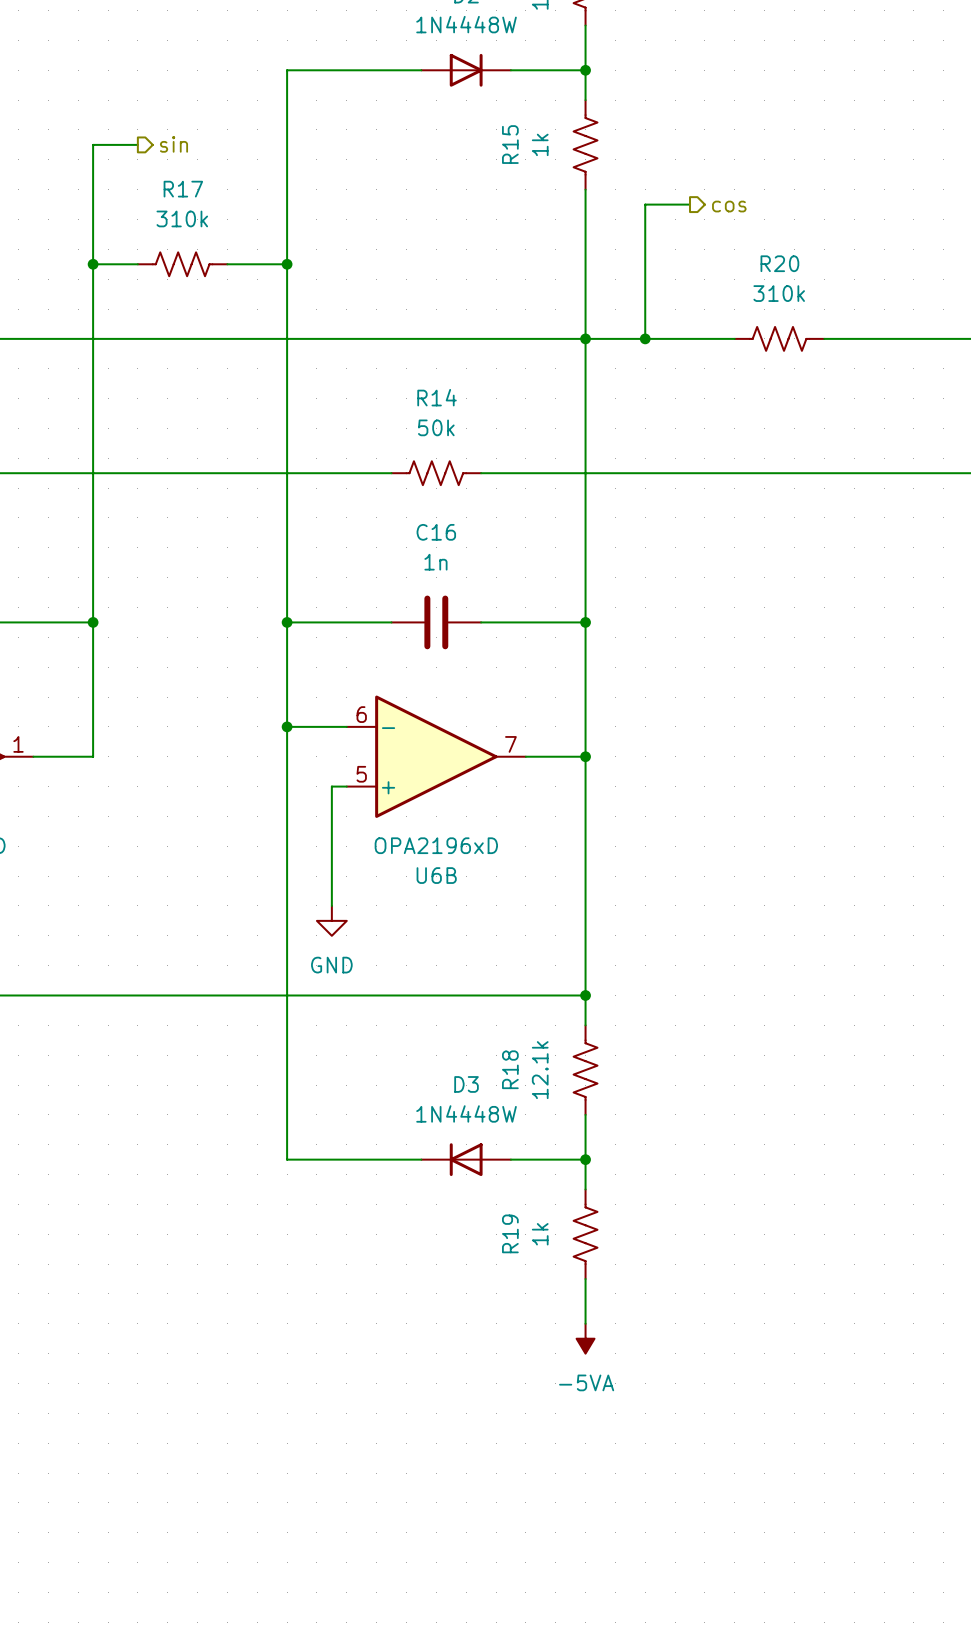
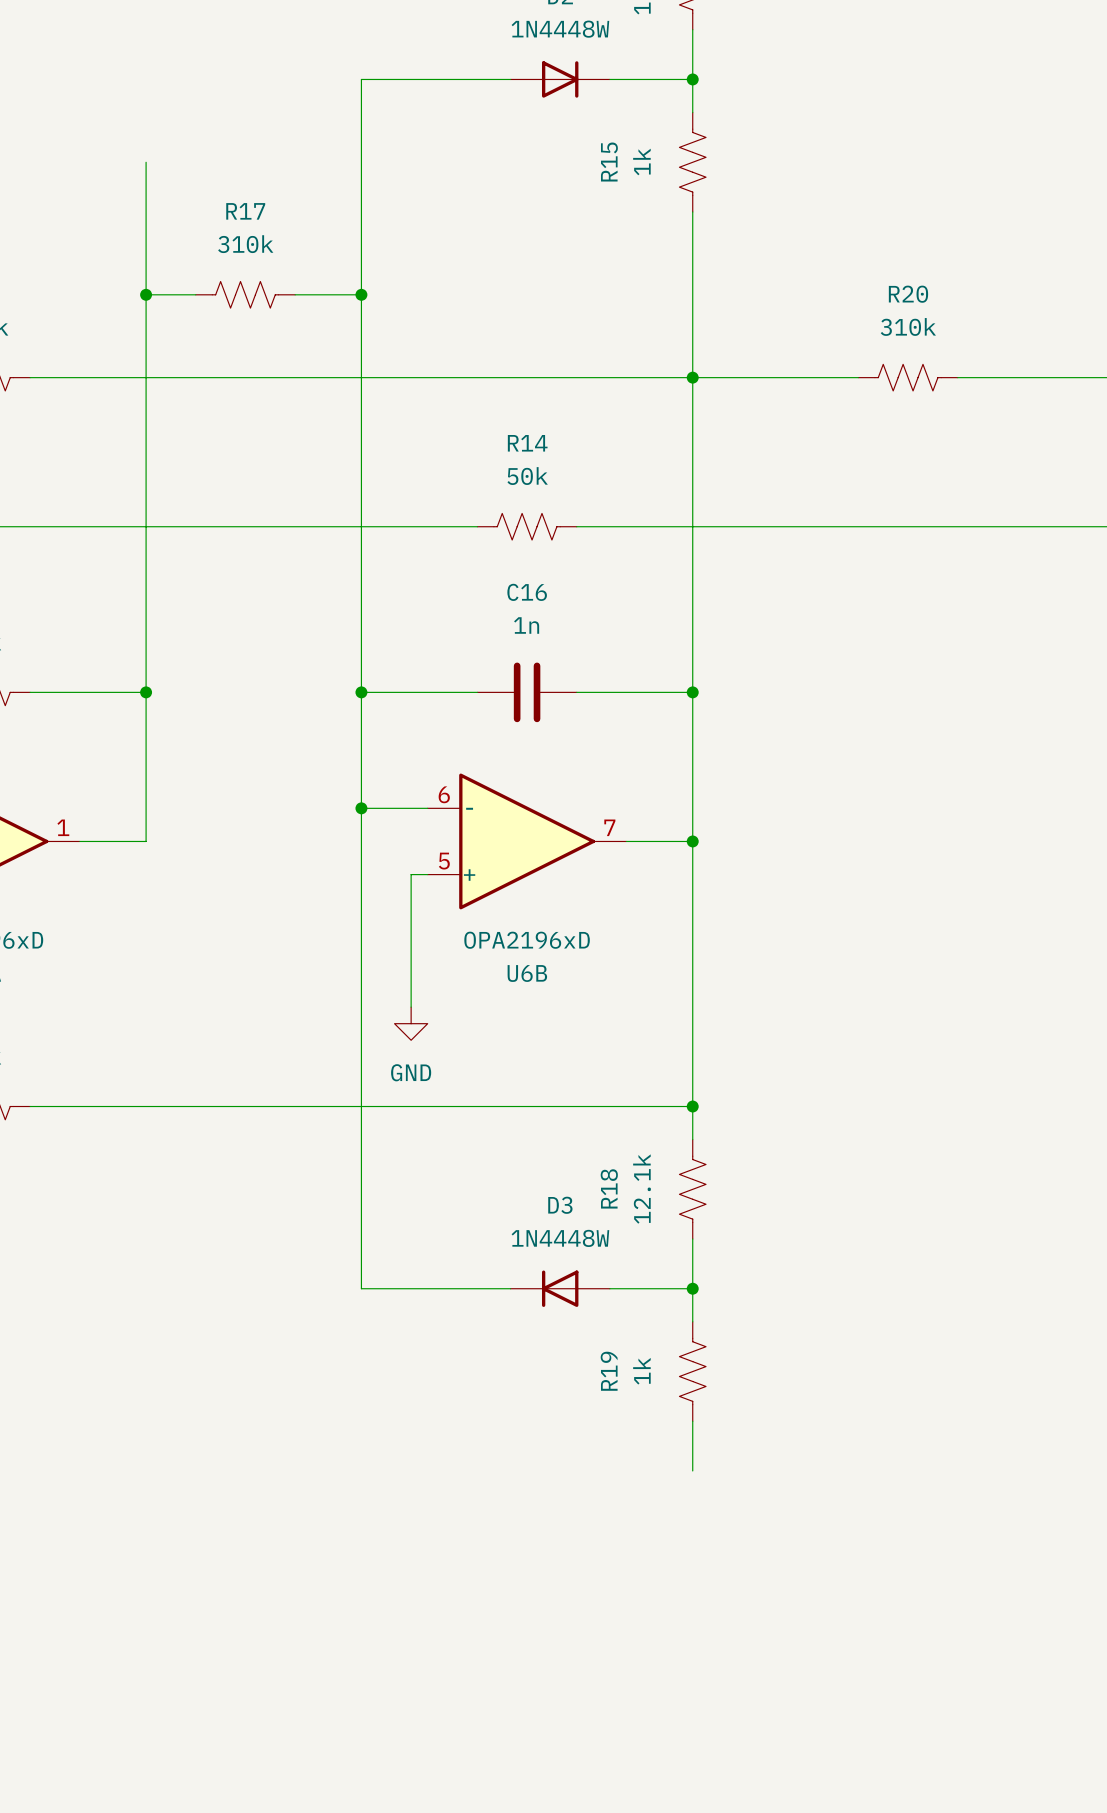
wire: (93, 144) (137, 144) -> none
hierarchical label: sin (173, 144) -> none
wire: (690, 204) (645, 204) (645, 338) -> none
hierarchical label: cos (729, 206) -> none
junction: (645, 338) -> none
power symbol: -5VA (585, 1338) -> none

